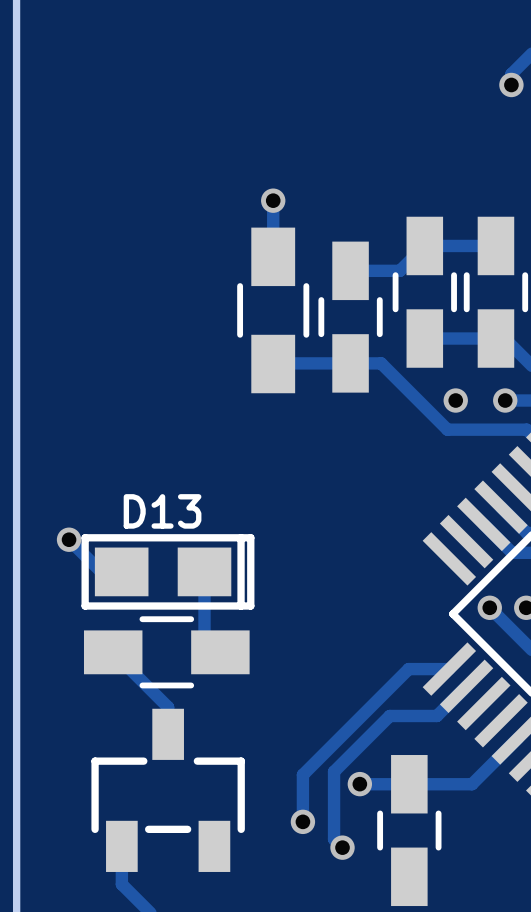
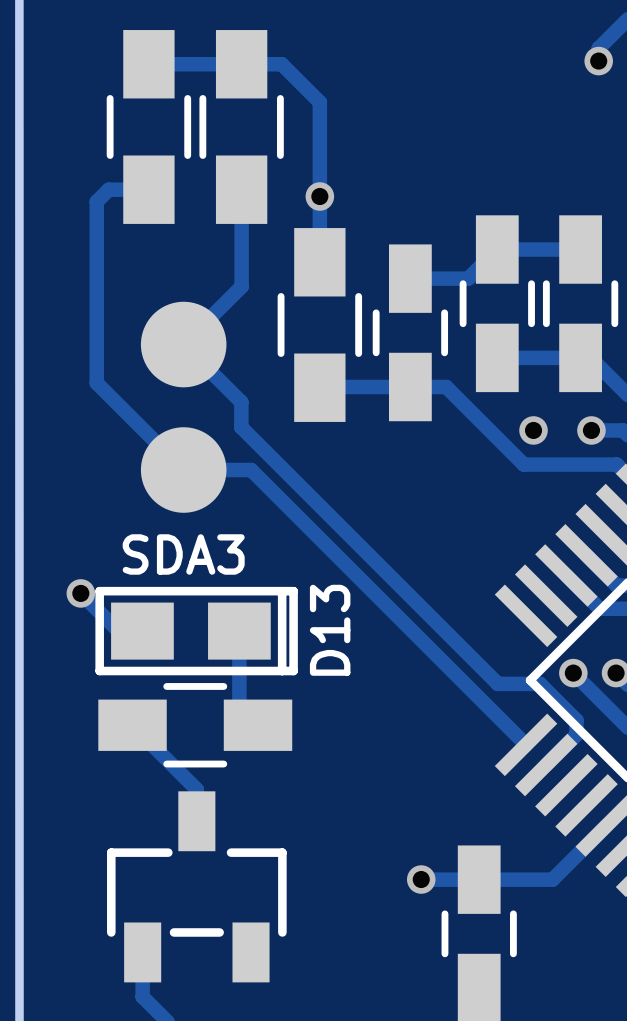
track: none -> (148, 64) (281, 64) (319, 102) (319, 196)
part: none -> (148, 126)
part: none -> (241, 126)
part: none -> (183, 344)
part: none -> (183, 470)
text: D13 (162, 511) -> SDA3 (183, 554)
text: none -> D13 (330, 630)
track: (449, 669) (408, 669) (302, 774) (302, 821) -> (526, 744) (251, 470) (183, 470) (96, 383) (96, 201) (108, 189) (148, 189)
track: (466, 686) (436, 715) (389, 715) (334, 771) (334, 839) (342, 847) -> (546, 765) (576, 734) (576, 720) (540, 683) (497, 683) (241, 427) (241, 402) (183, 344) (241, 286) (241, 189)
via: (302, 821) -> none
via: (342, 847) -> none

